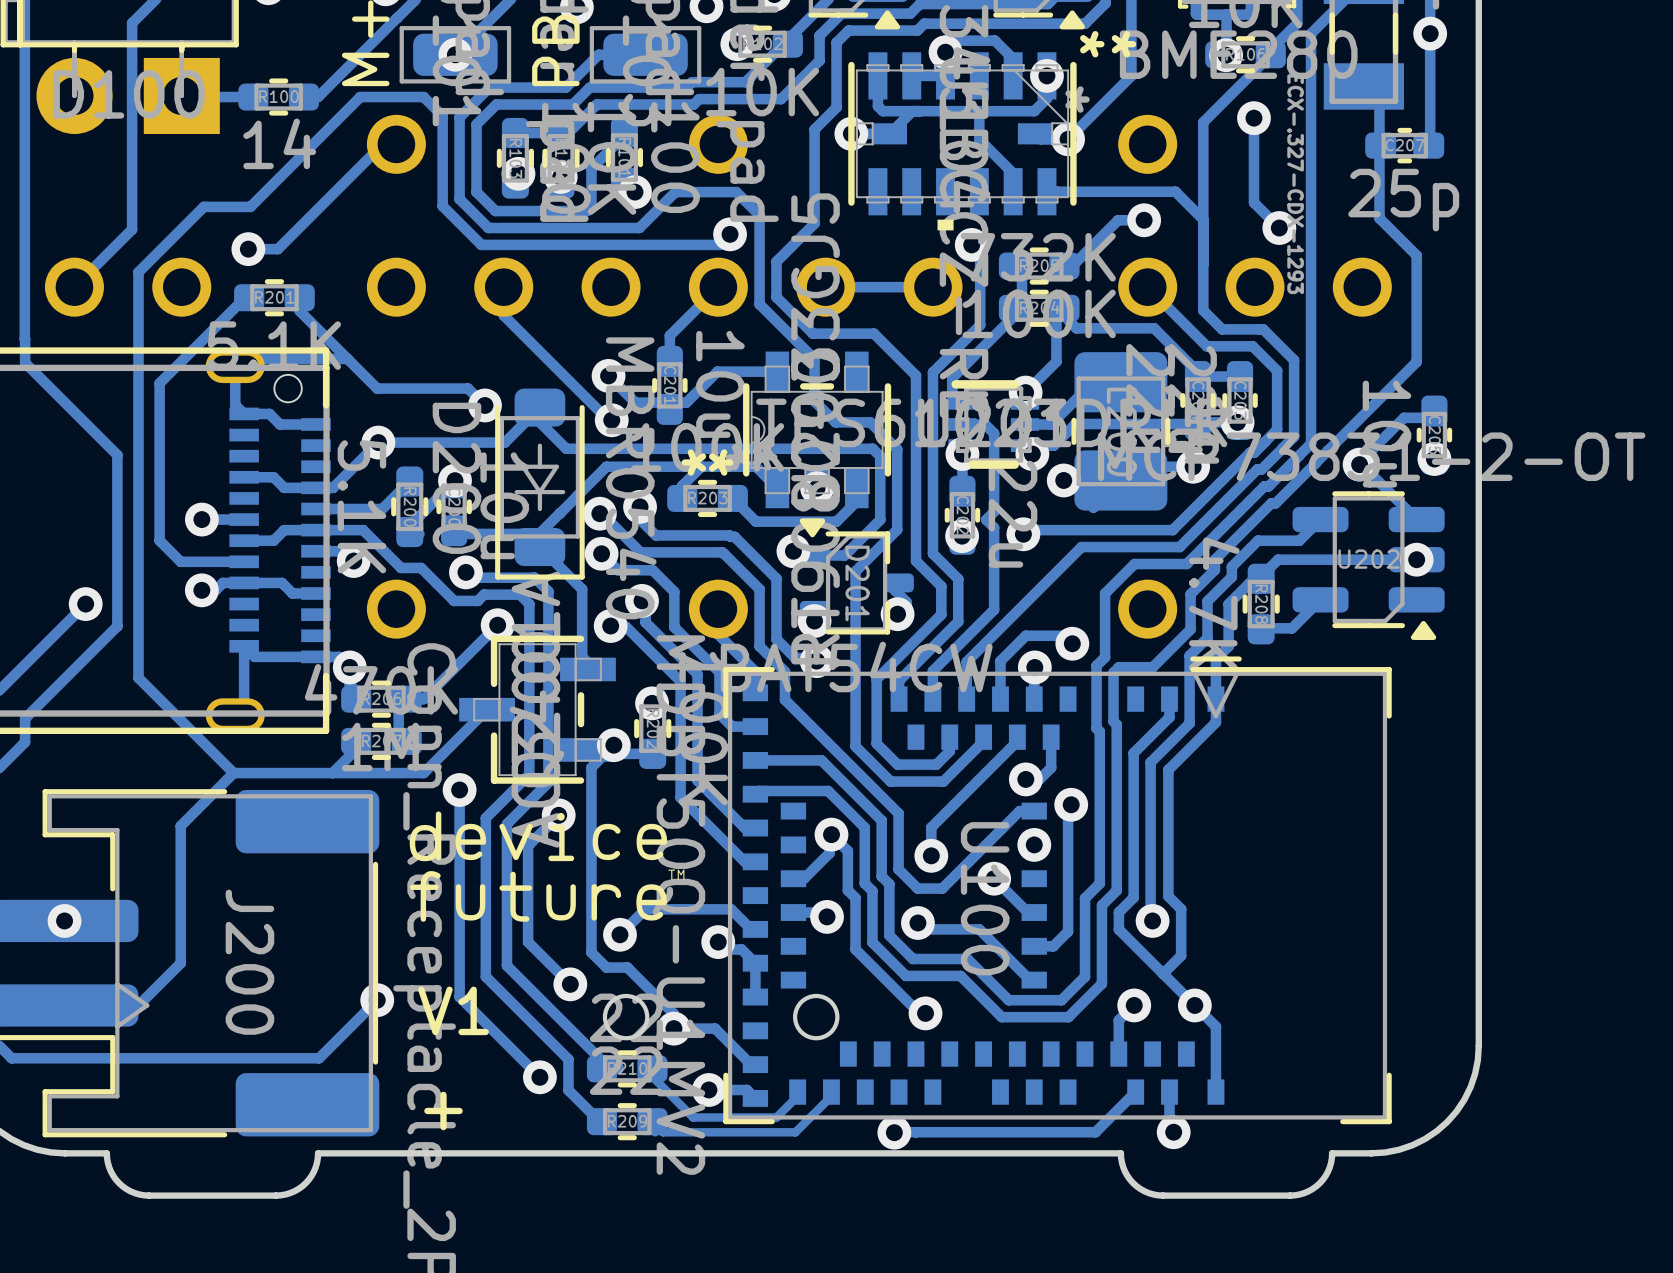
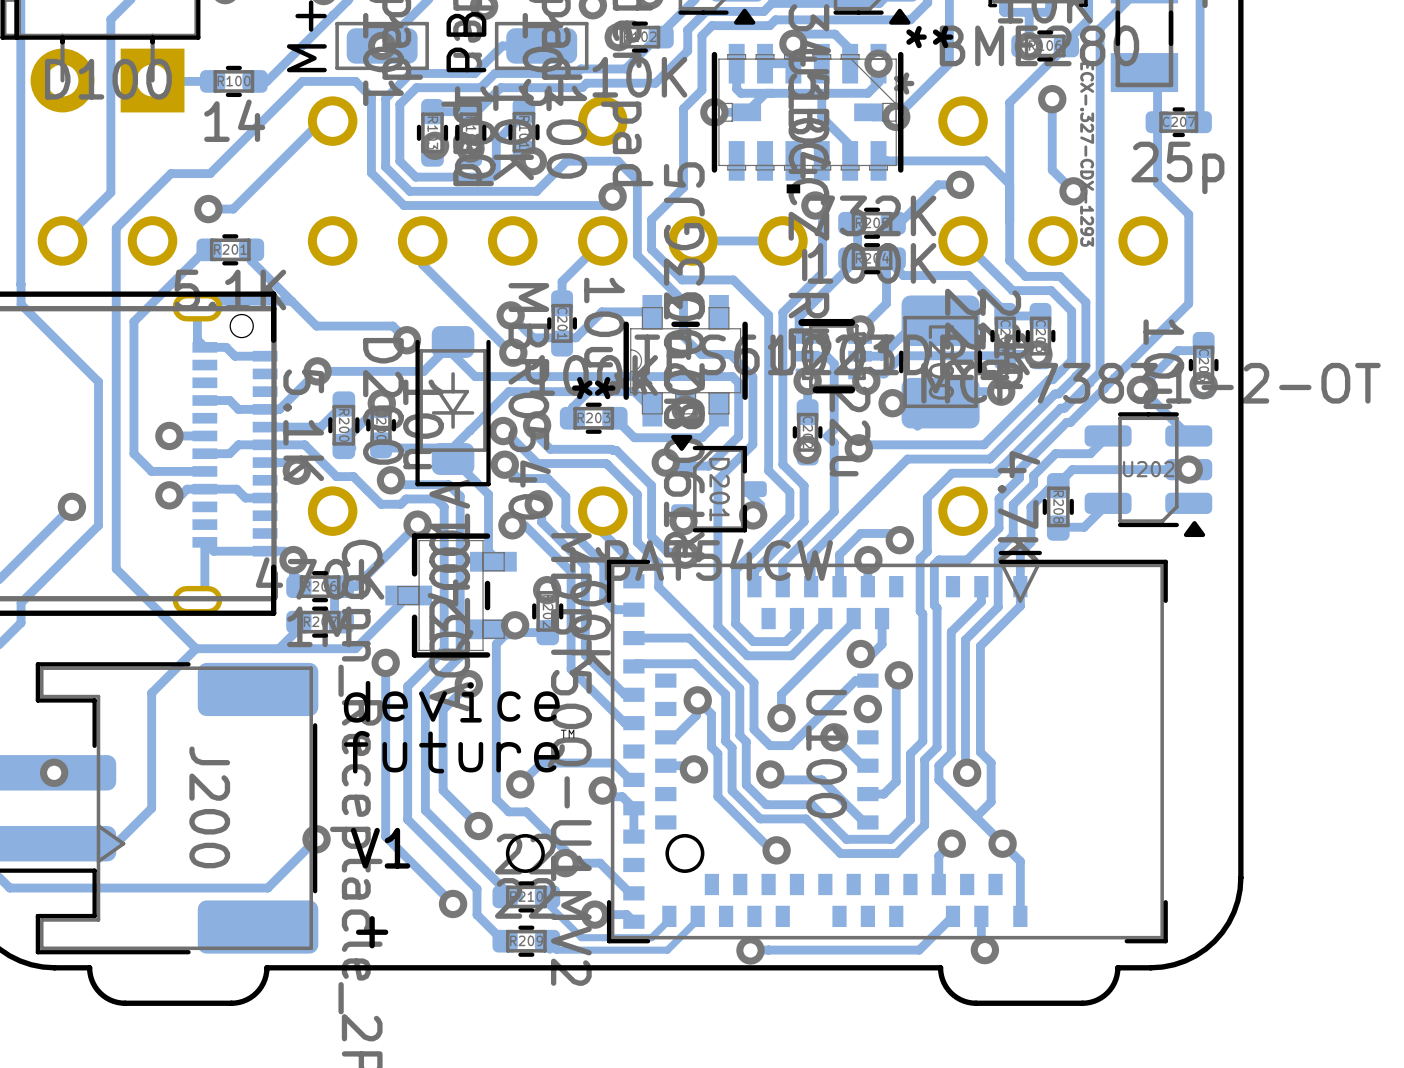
via: (1430, 33) -> none

